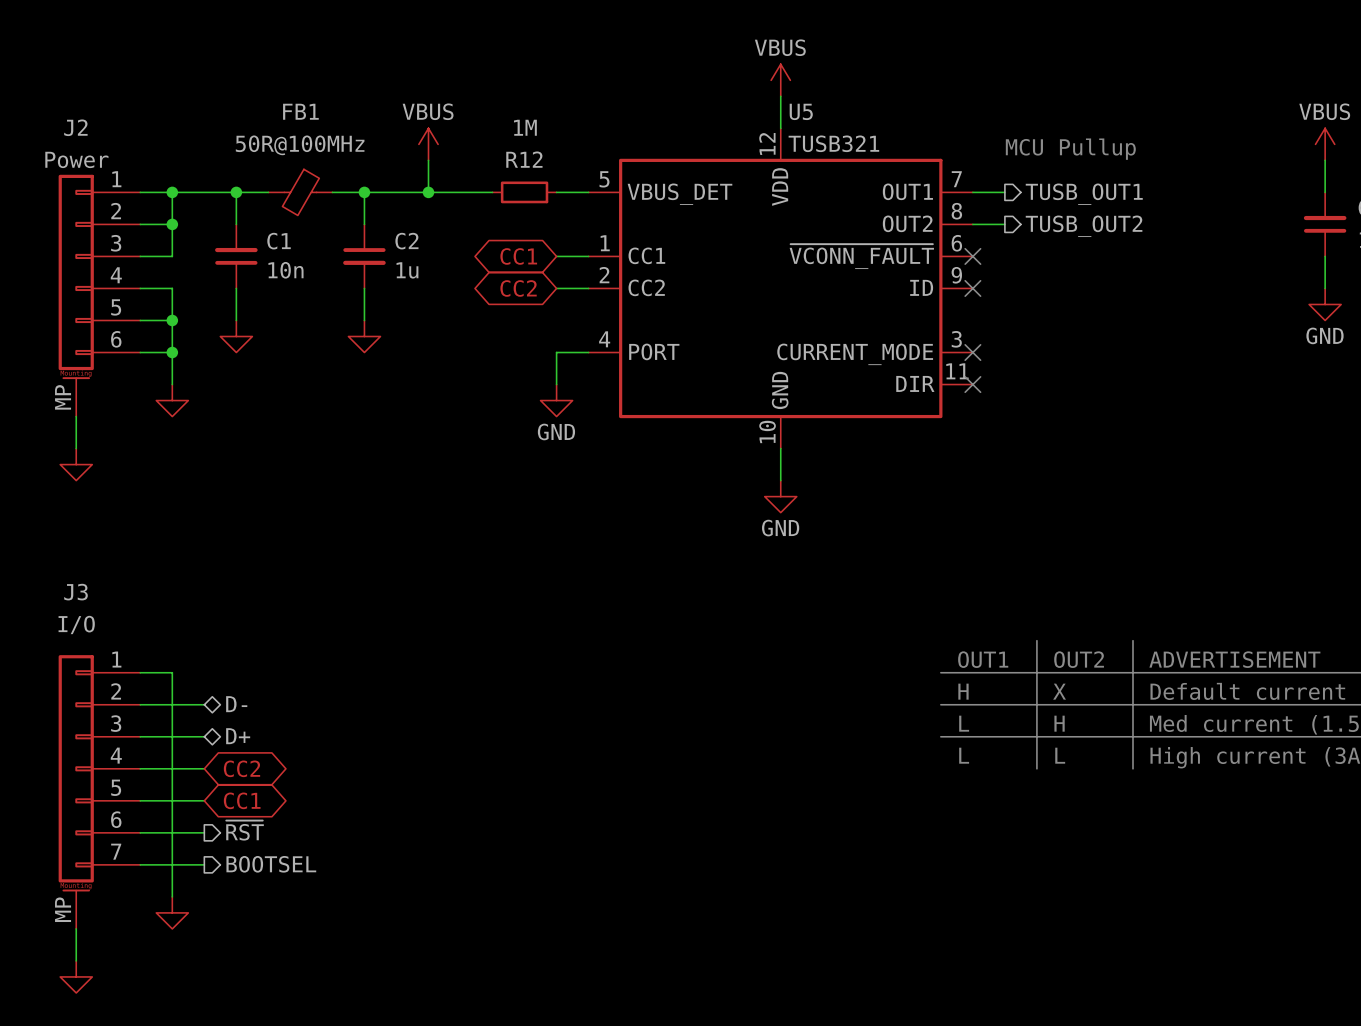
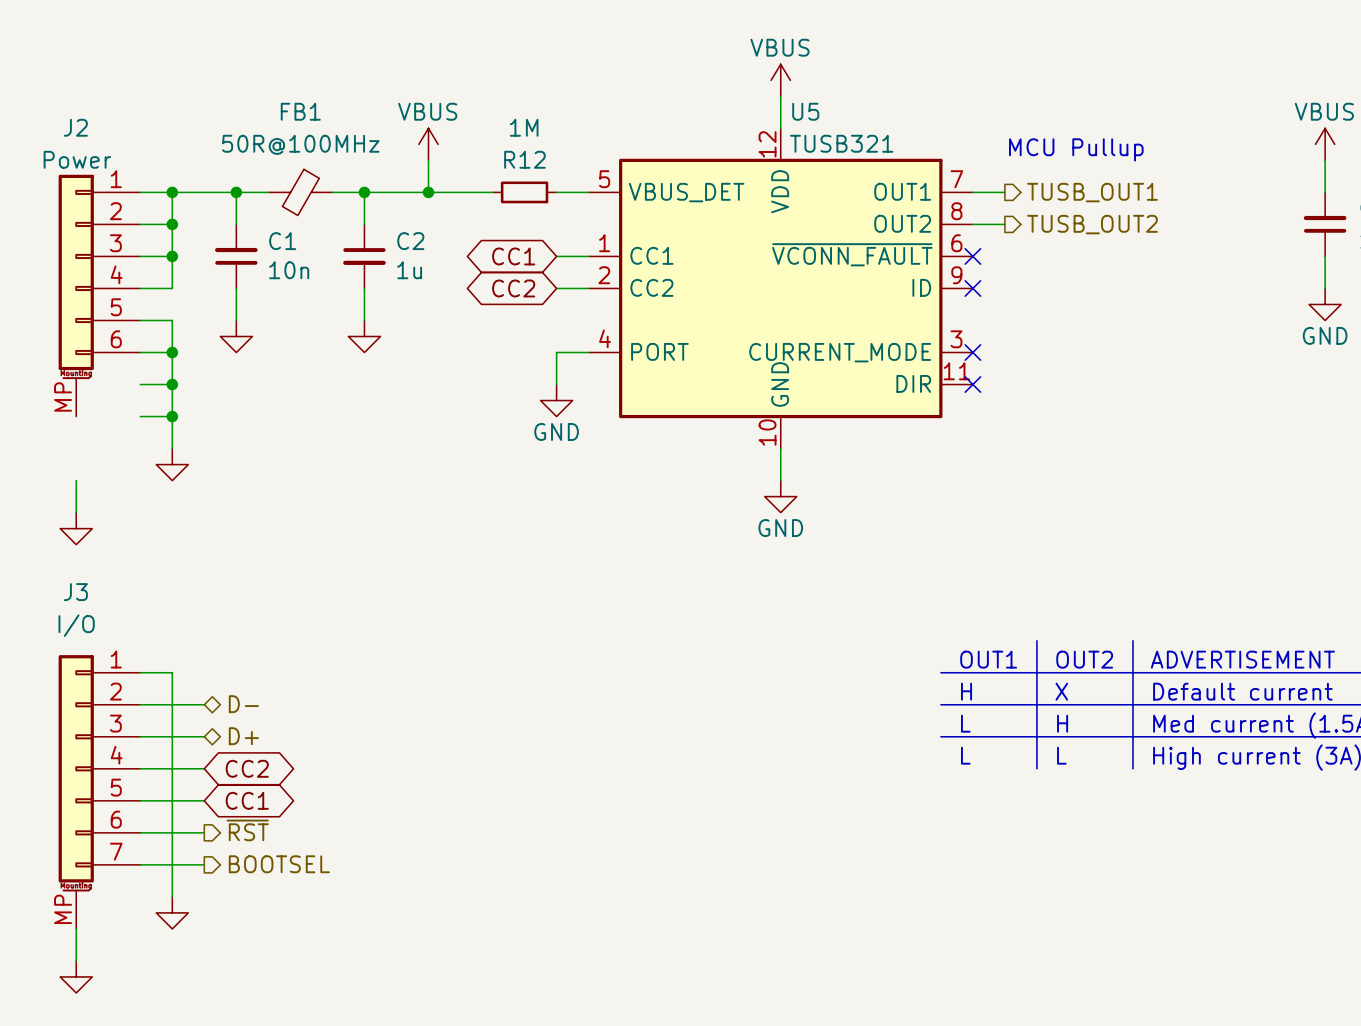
junction: none -> (172, 256)
wire: (172, 288) (172, 320) -> (172, 288) (172, 256)
junction: (172, 320) -> none
wire: none -> (140, 384) (172, 384) (172, 448)
junction: none -> (172, 384)
power symbol: (172, 400) -> none
wire: (76, 416) (76, 448) -> (76, 480) (76, 512)
wire: none -> (140, 416) (172, 416)
junction: none -> (172, 416)
power symbol: (76, 464) -> none
power symbol: none -> (172, 464)
power symbol: none -> (76, 528)

